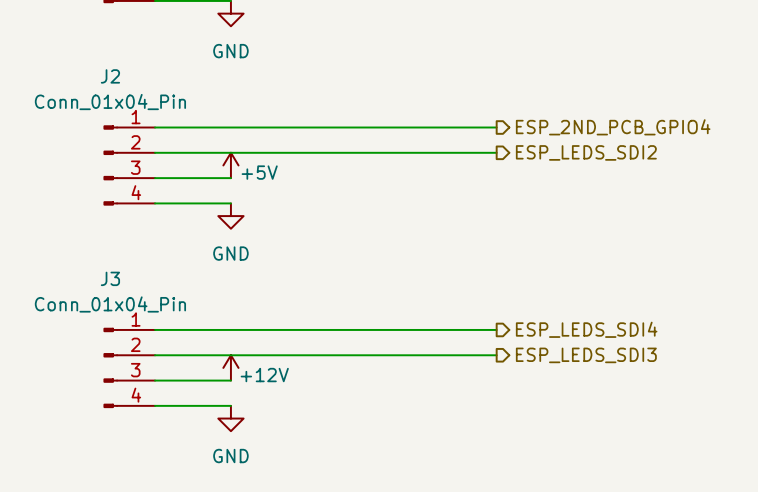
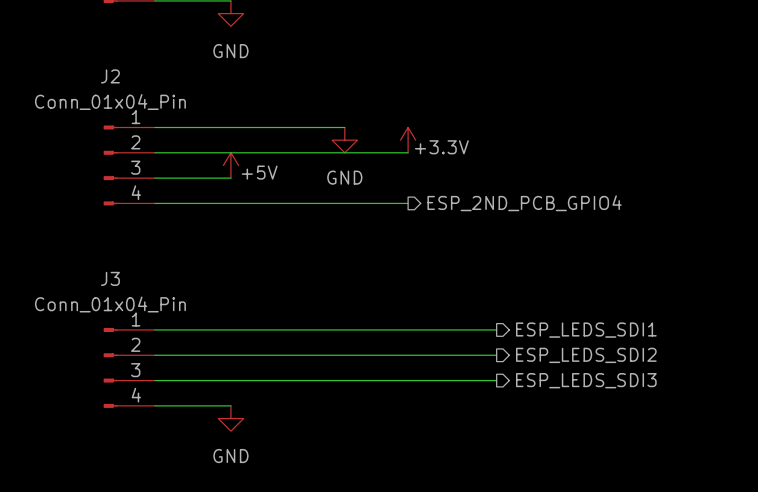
wire: (344, 127) (496, 127) -> none
hierarchical label position: ESP_2ND_PCB_GPIO4 (613, 127) -> ESP_2ND_PCB_GPIO4 (524, 203)
power symbol: none -> +3.3V (408, 140)
wire: (408, 152) (496, 152) -> none
hierarchical label: ESP_LEDS_SDI2 (586, 152) -> none
wire: none -> (230, 203) (408, 203)
power symbol position: GND (230, 216) -> GND (344, 140)
hierarchical label: ESP_LEDS_SDI4 (586, 329) -> ESP_LEDS_SDI1 (586, 330)
hierarchical label: ESP_LEDS_SDI3 (586, 355) -> ESP_LEDS_SDI2 (586, 355)
power symbol: +12V (230, 367) -> none
wire: none -> (230, 380) (496, 380)
hierarchical label: none -> ESP_LEDS_SDI3 (586, 380)

